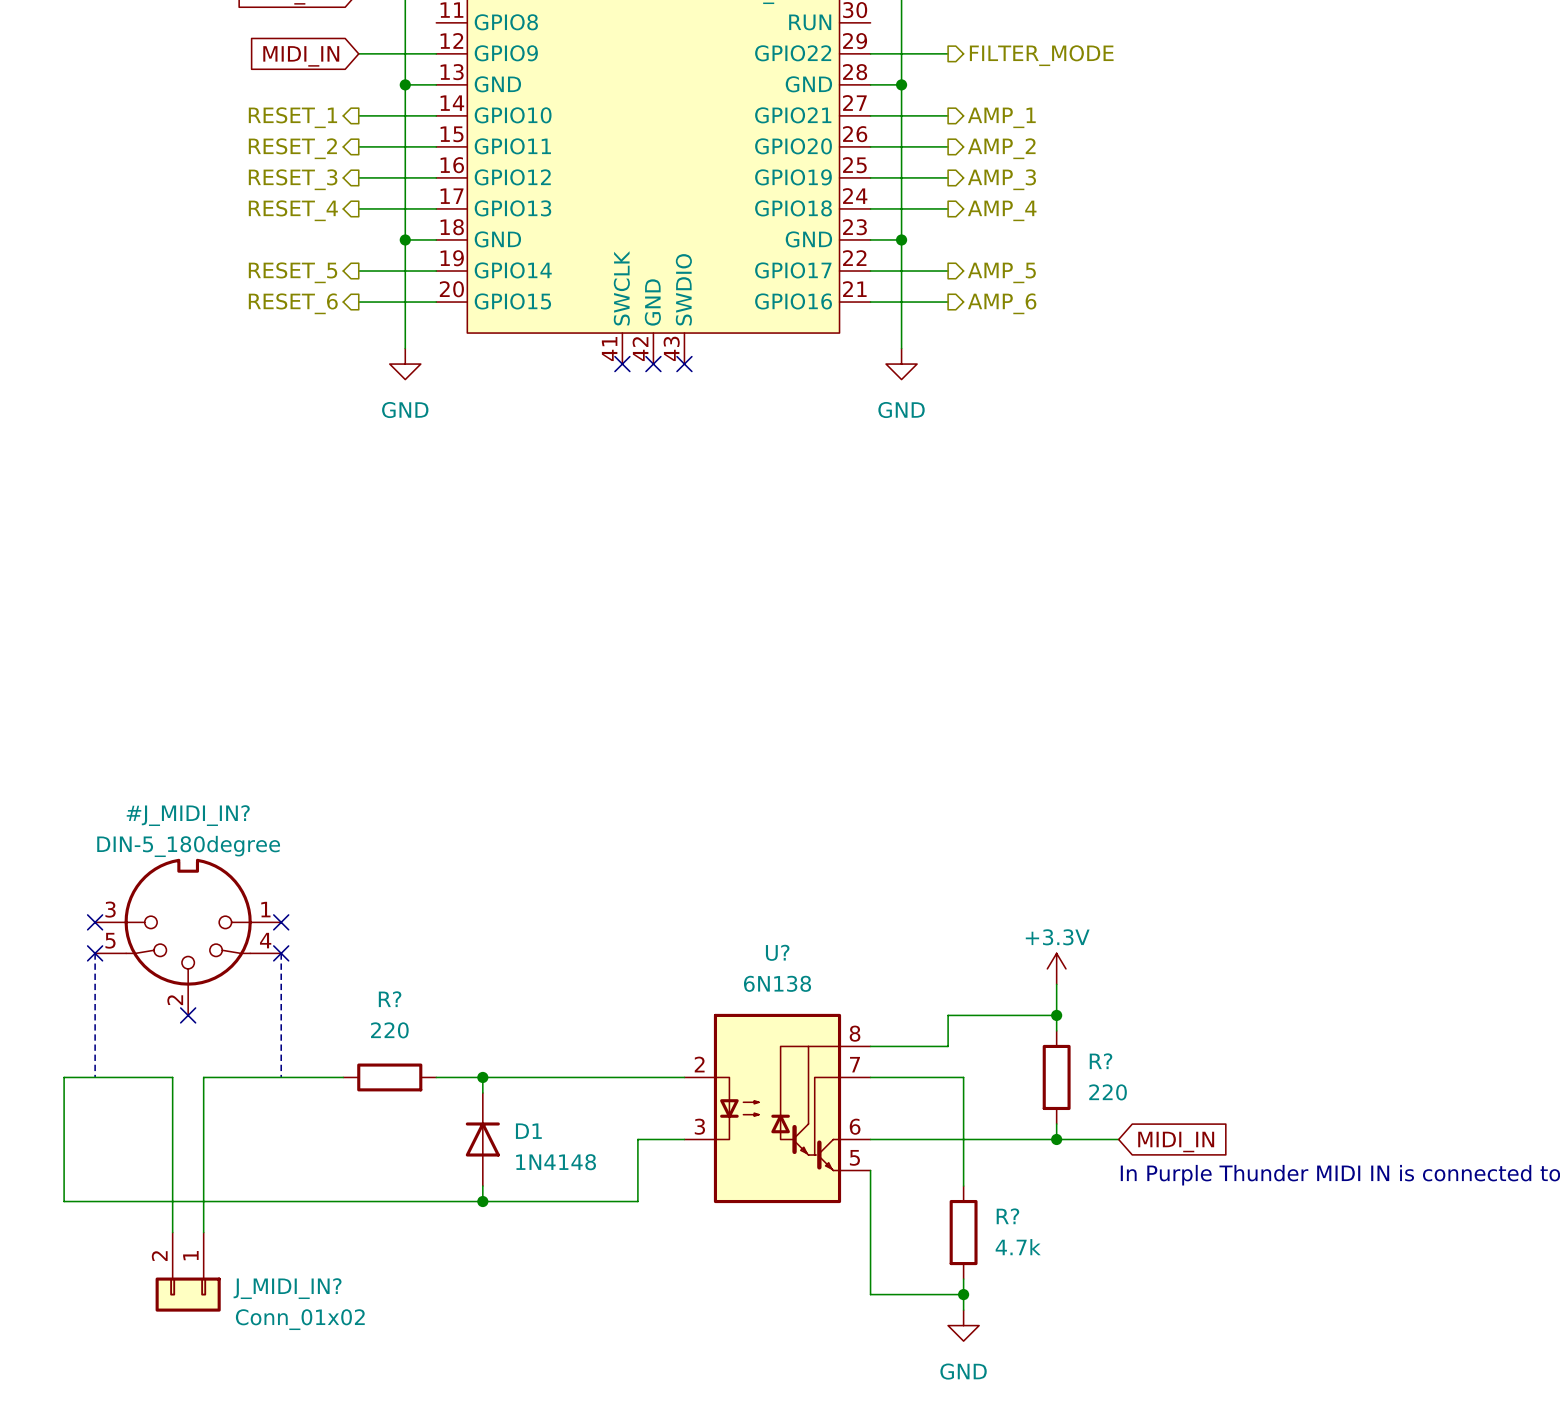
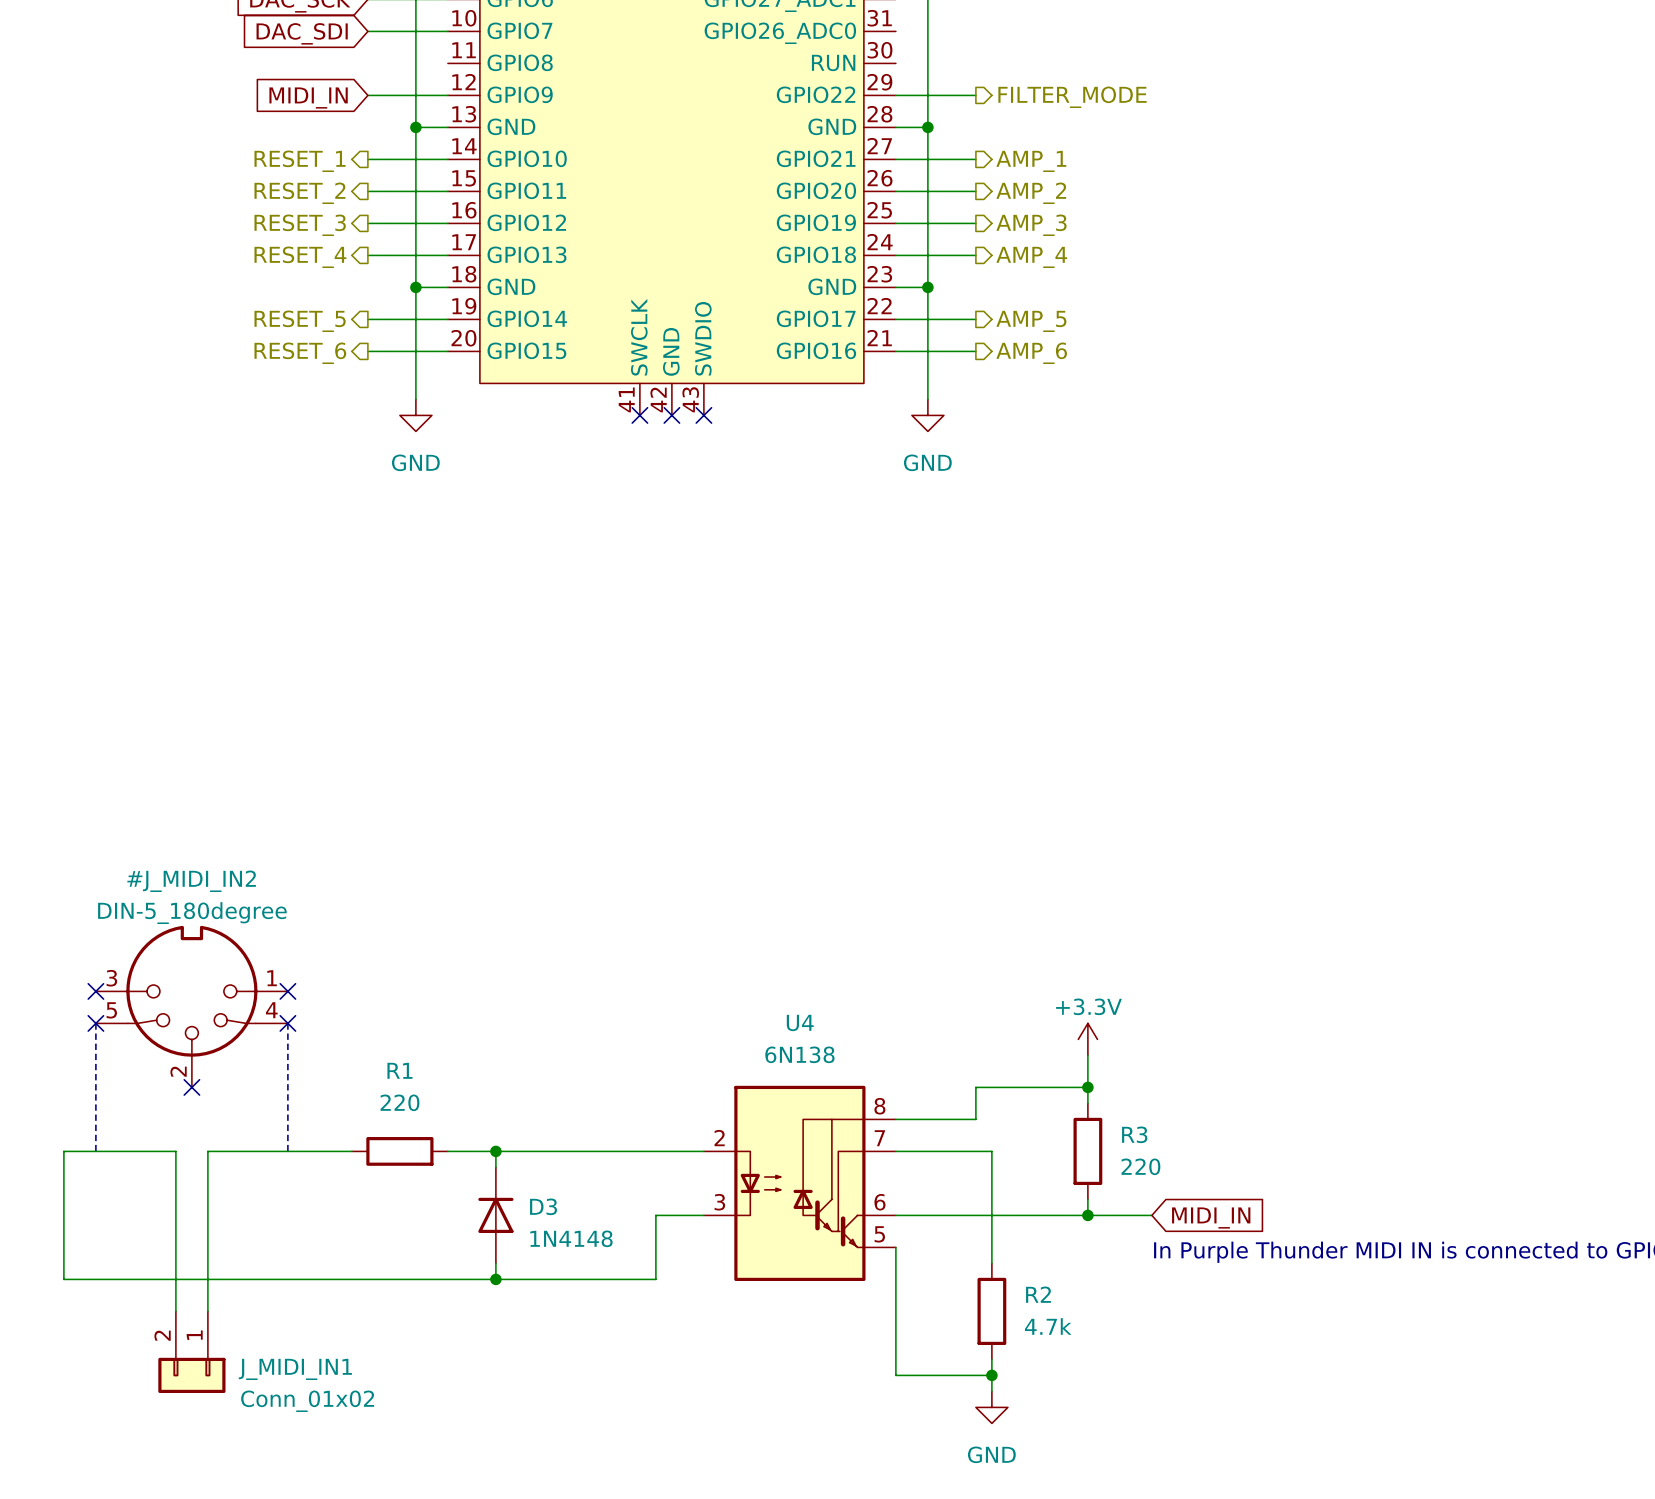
#J_MIDI_IN? name: #J_MIDI_IN? (188, 815) -> #J_MIDI_IN2 (191, 881)
U? name: U? (777, 952) -> U4 (800, 1022)
R? name: R? (390, 999) -> R1 (399, 1070)
R? name: R? (1101, 1061) -> R3 (1134, 1134)
D1 name: D1 (528, 1131) -> D3 (543, 1206)
R? name: R? (1007, 1216) -> R2 (1038, 1294)
J_MIDI_IN? name: J_MIDI_IN? (287, 1288) -> J_MIDI_IN1 (295, 1369)

